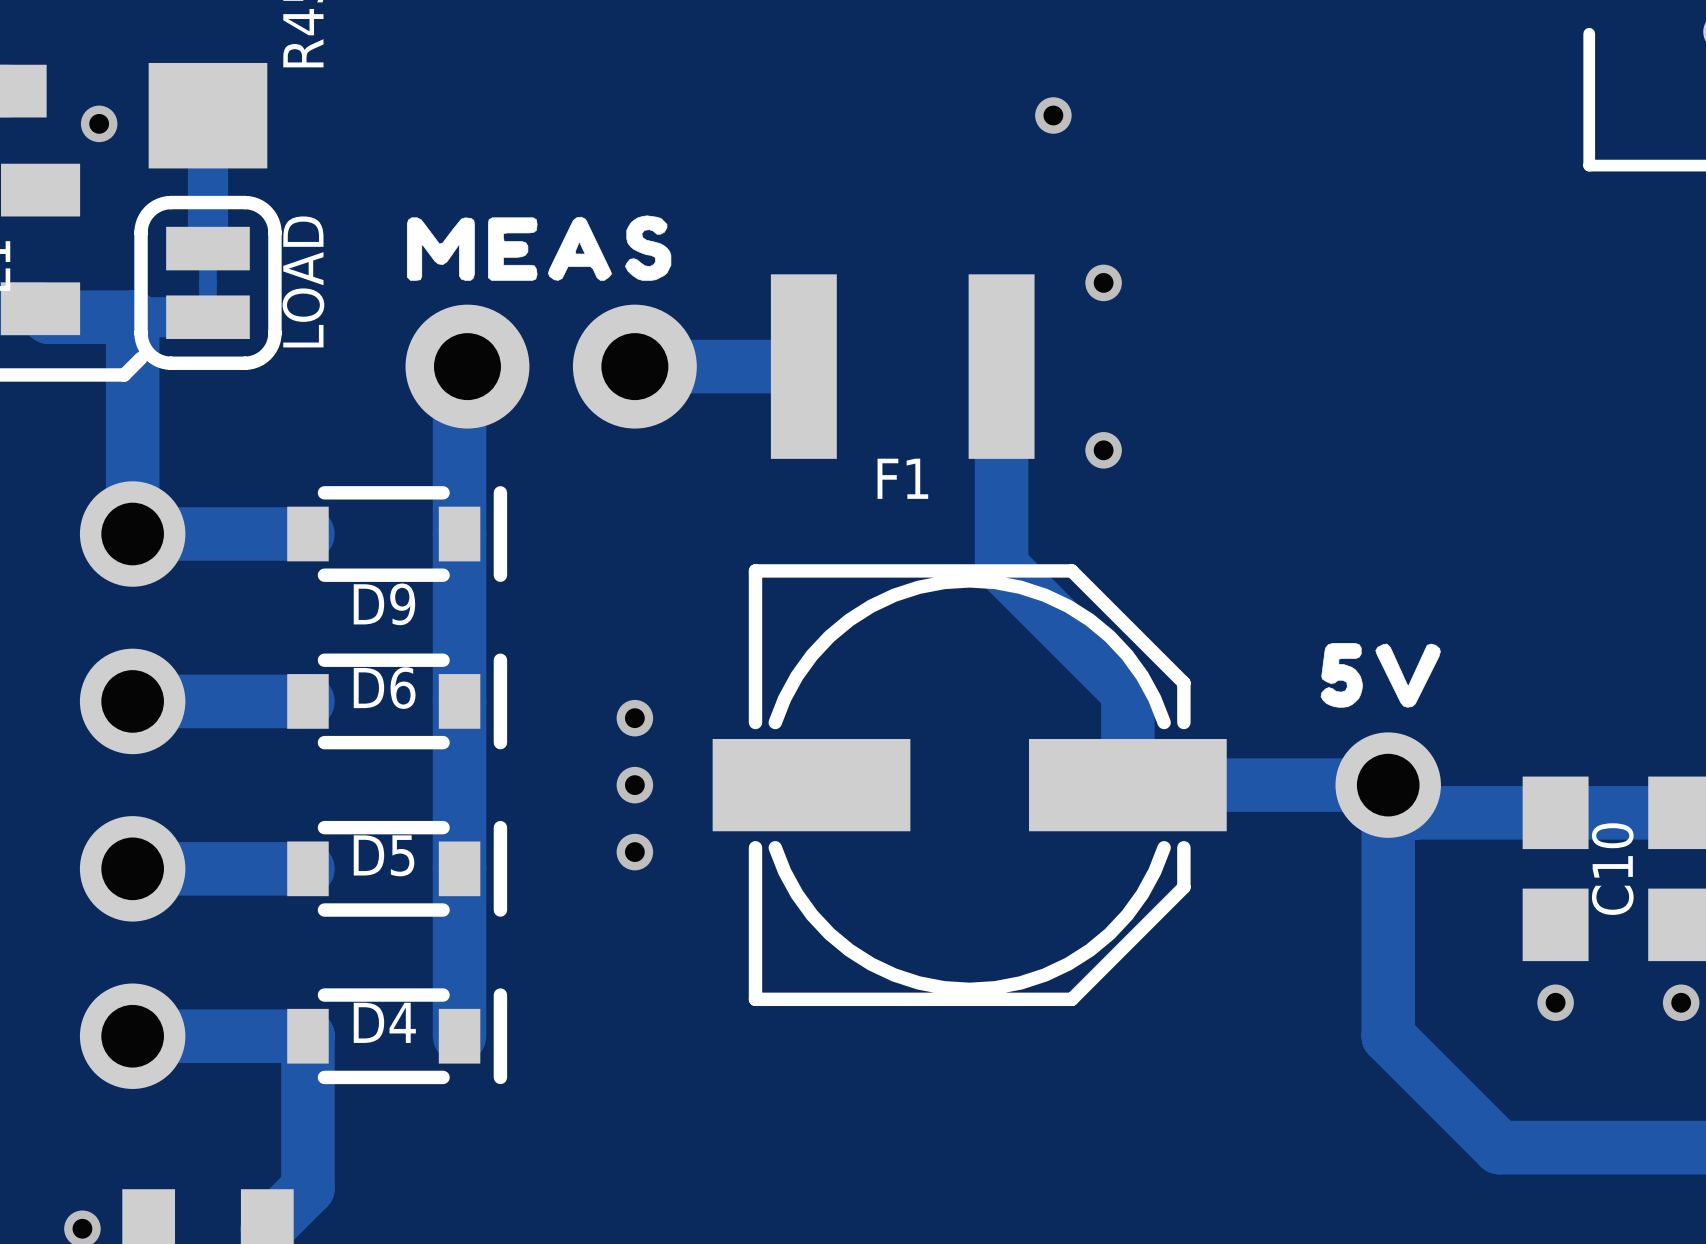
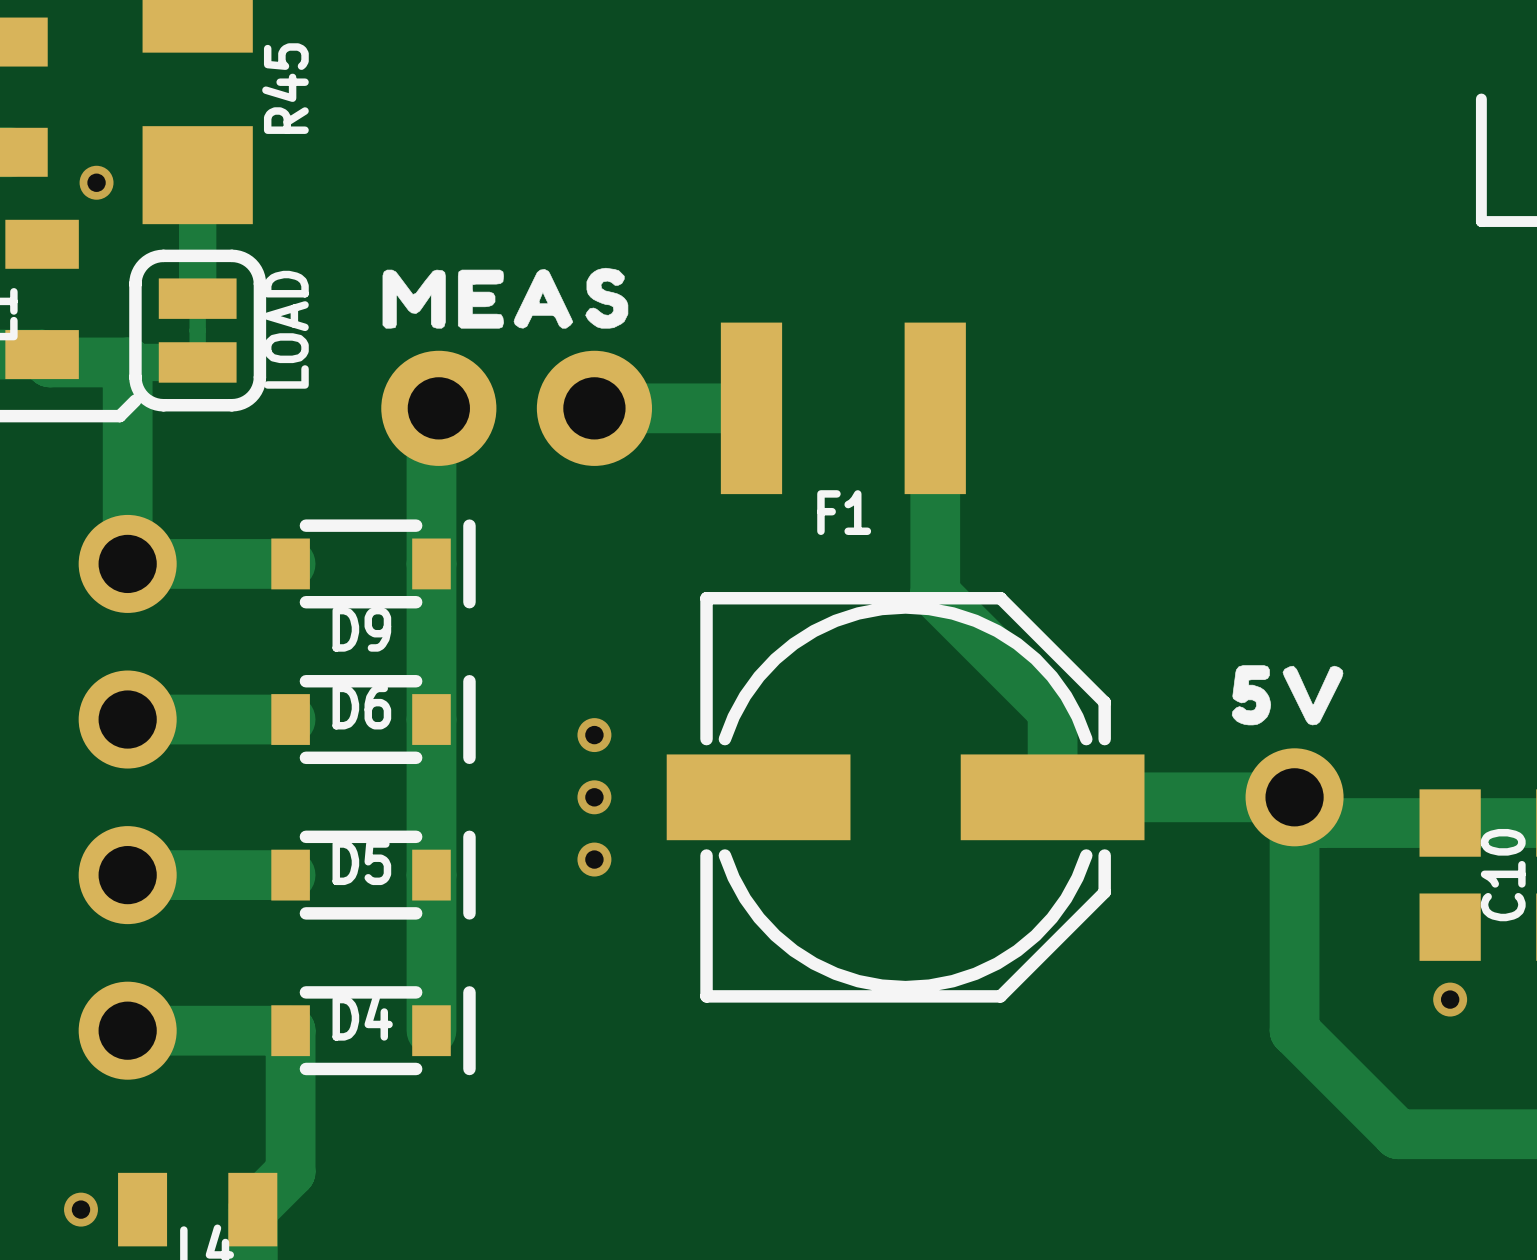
via: (1053, 115) -> none
via: (1103, 282) -> none
via: (1103, 450) -> none

